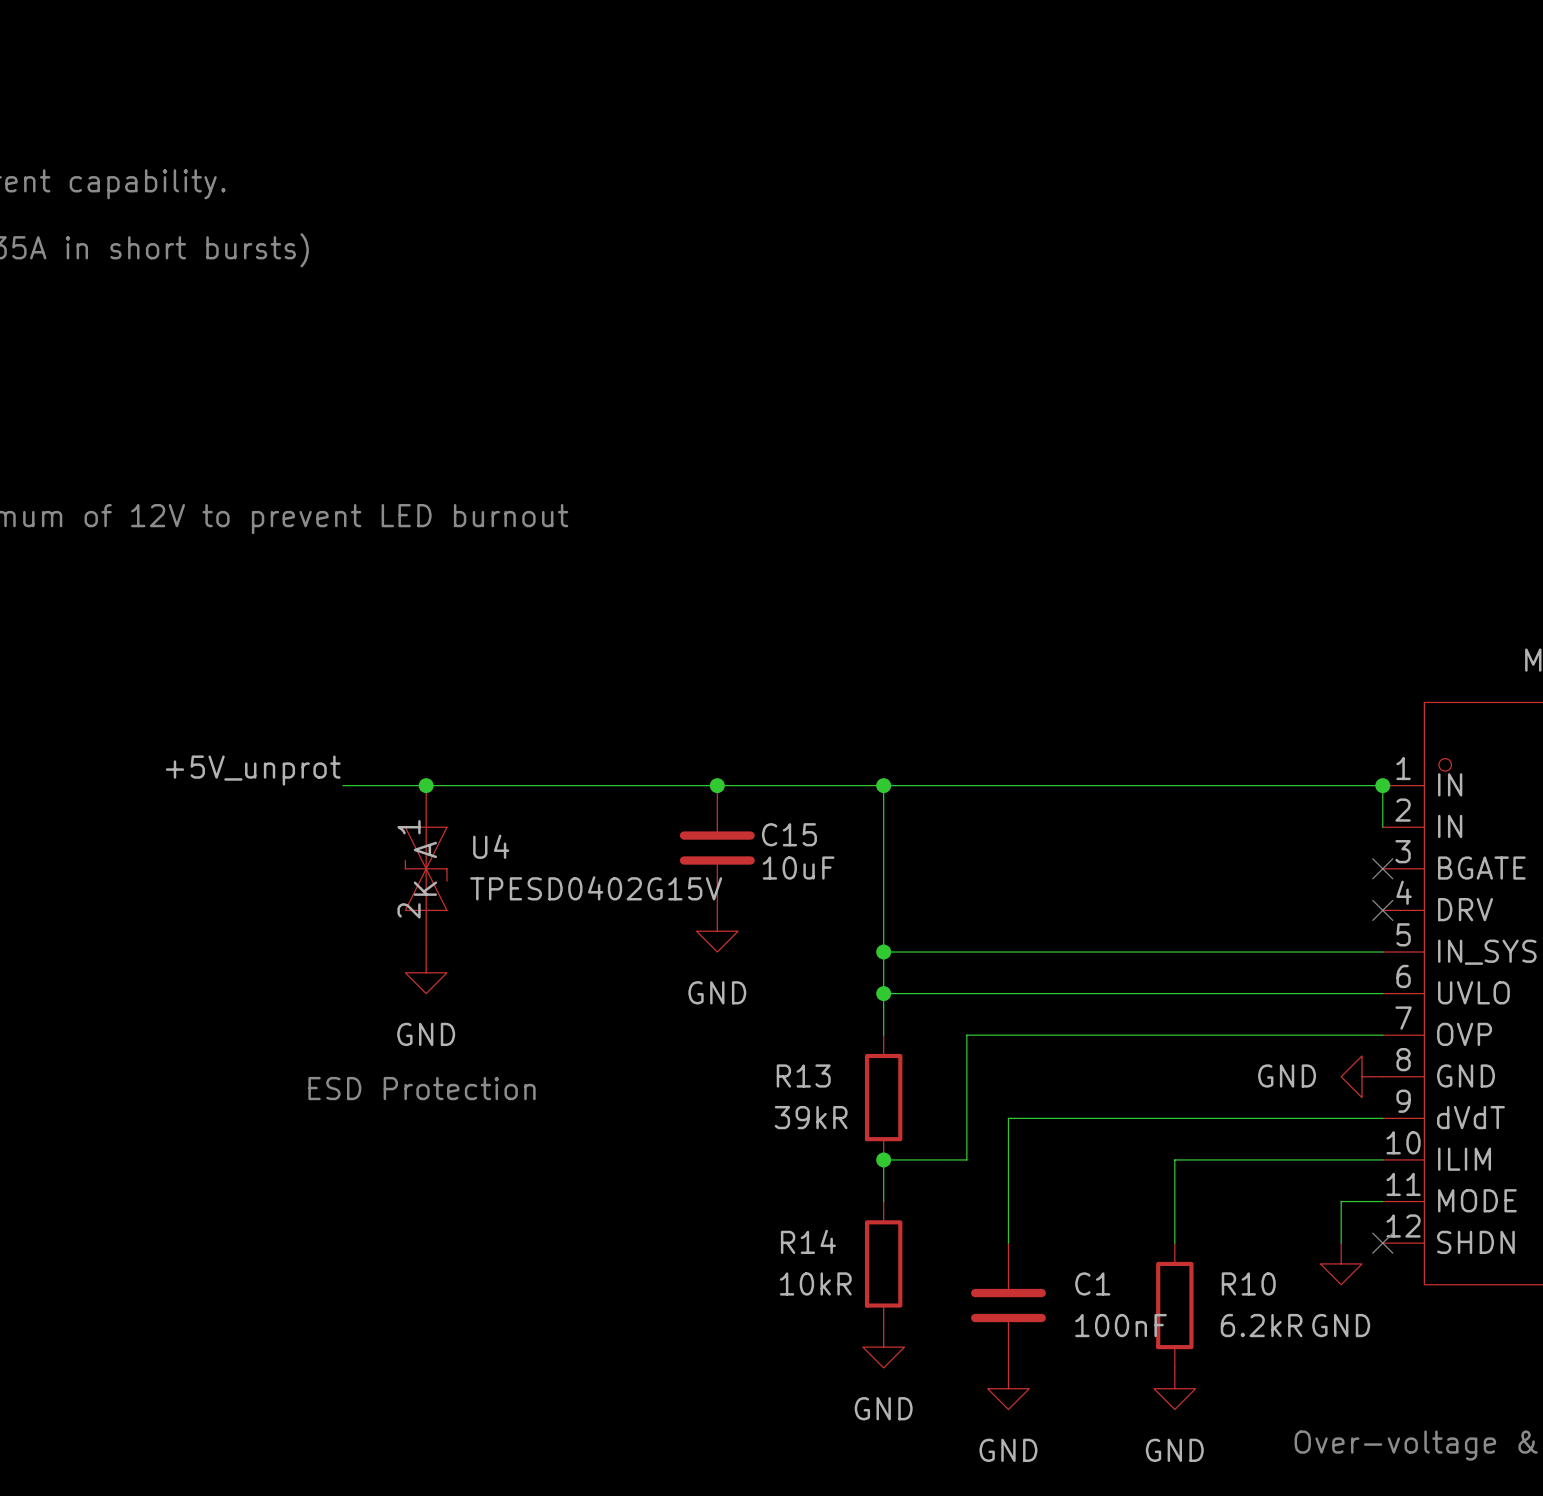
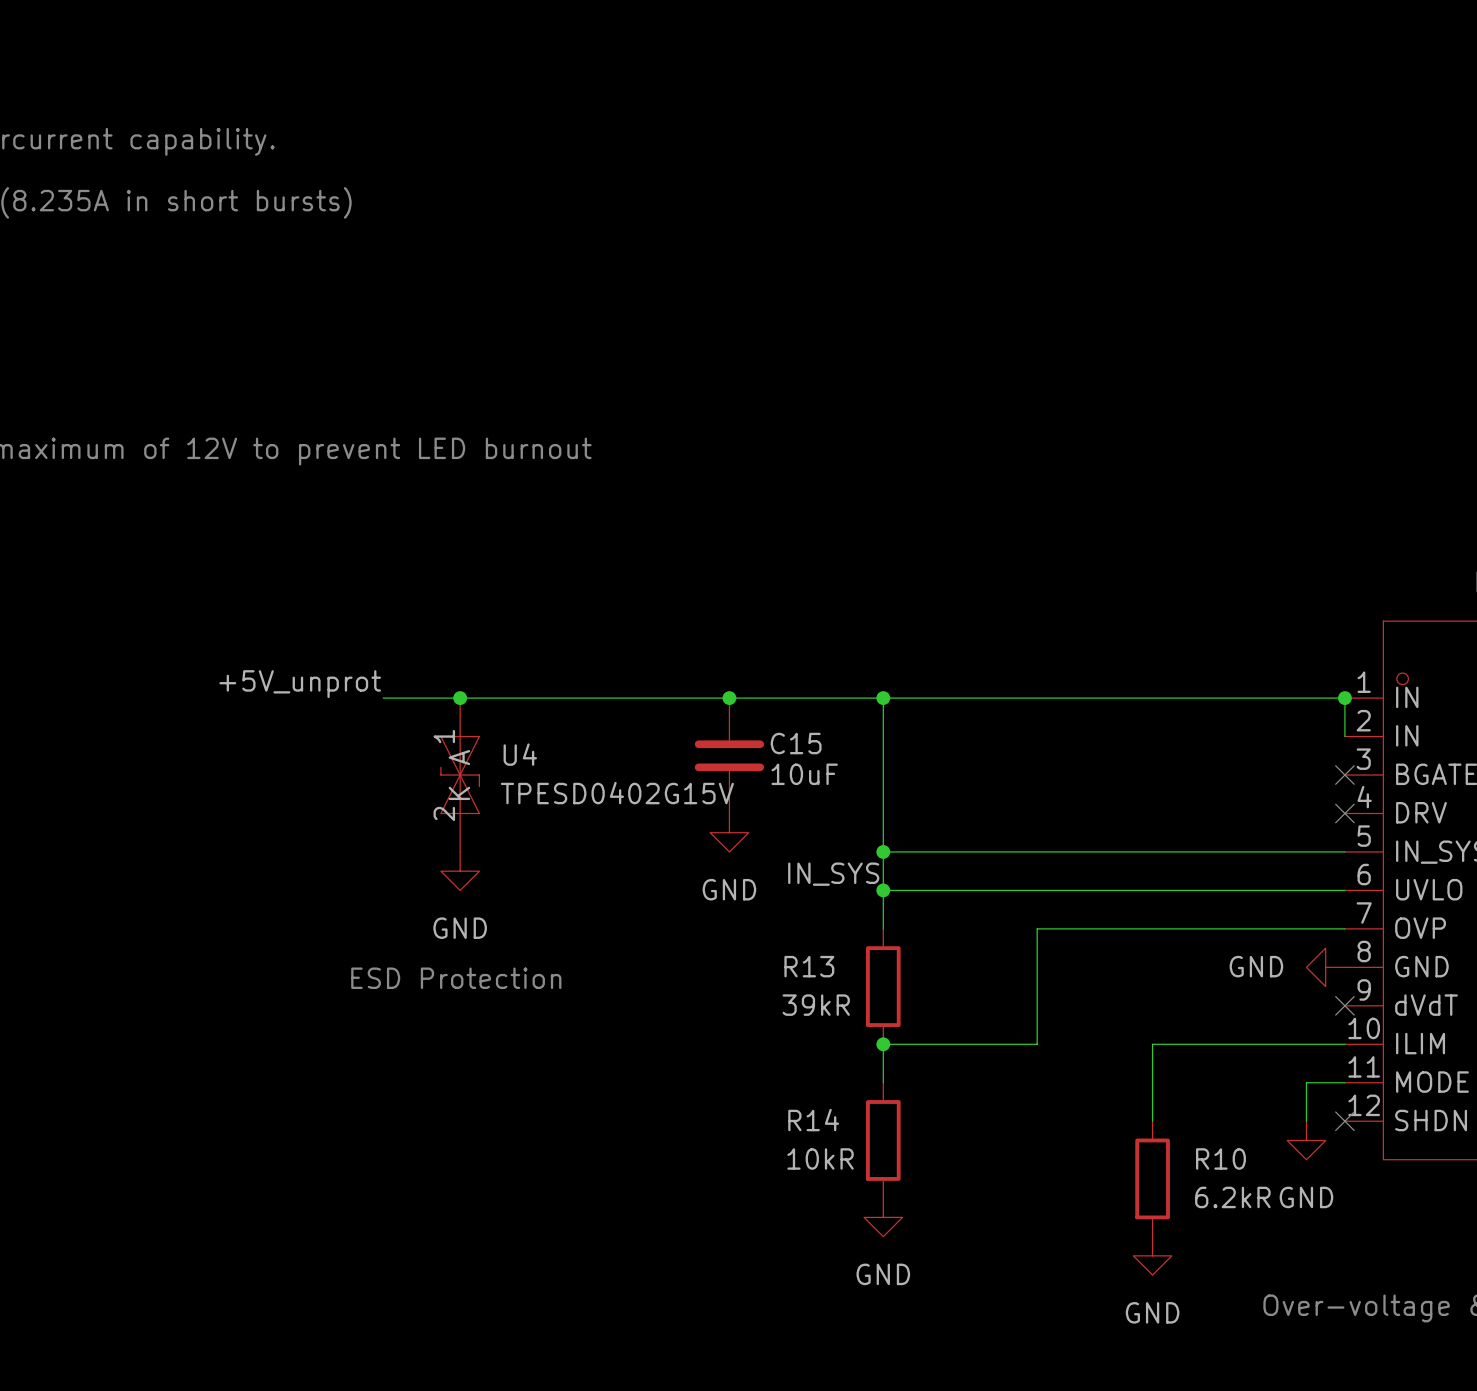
label: none -> IN_SYS (833, 874)
wire: (1050, 1035) (966, 1035) (966, 1159) -> (1037, 928) (1037, 1044) (960, 1044)
wire: (1382, 1118) (1008, 1118) (1008, 1243) -> none
no-connect mark: none -> (1344, 1005)
C1: 100nF (1008, 1305) -> none
power symbol: GND (1008, 1388) -> none

